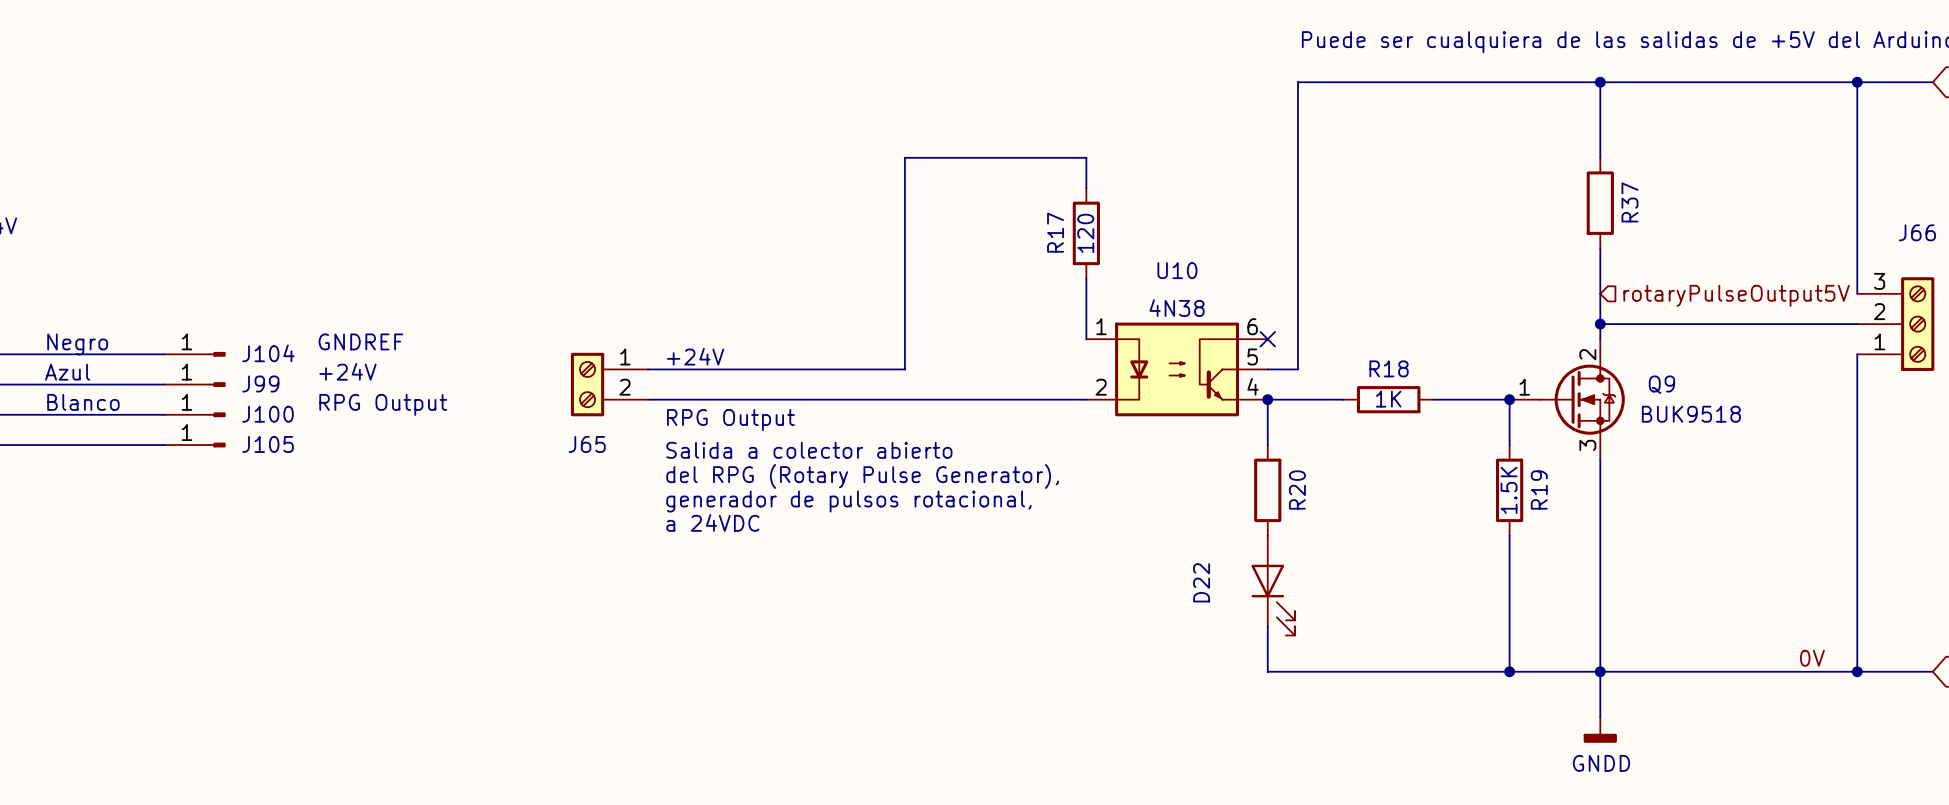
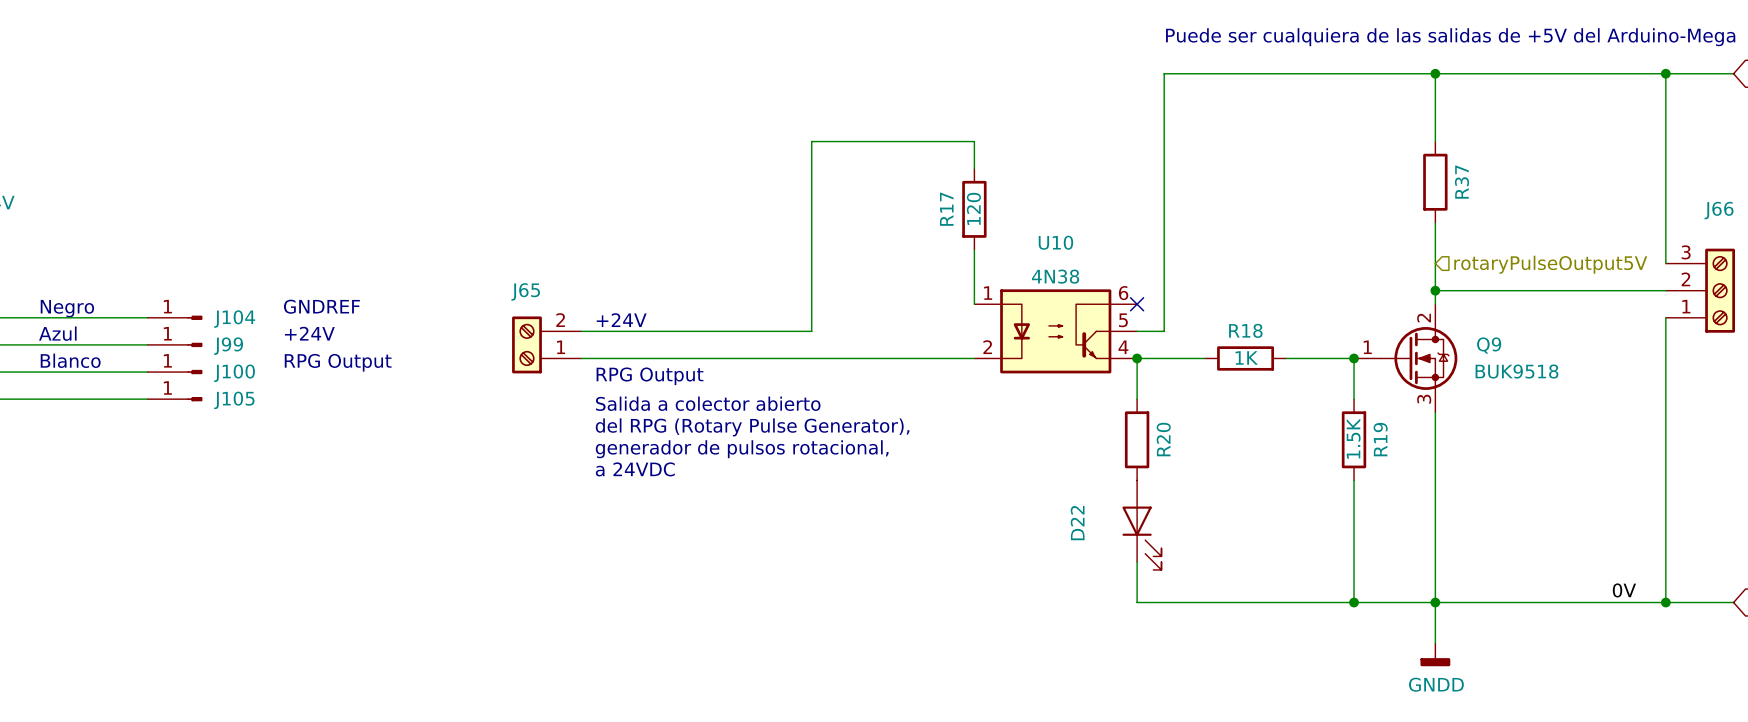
J65 flip: as is (587, 384) -> up-down (526, 344)

